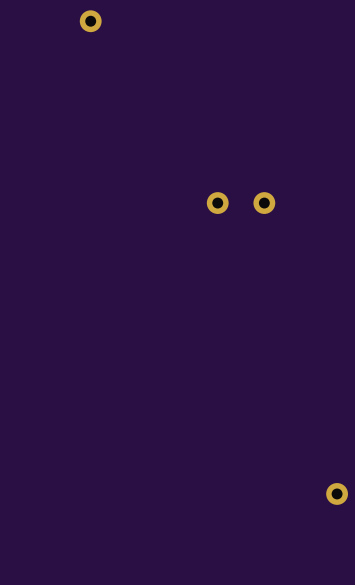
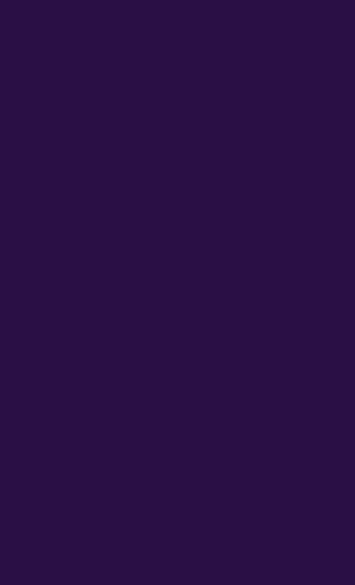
via: (90, 21) -> none
via: (217, 203) -> none
via: (264, 203) -> none
via: (337, 493) -> none

